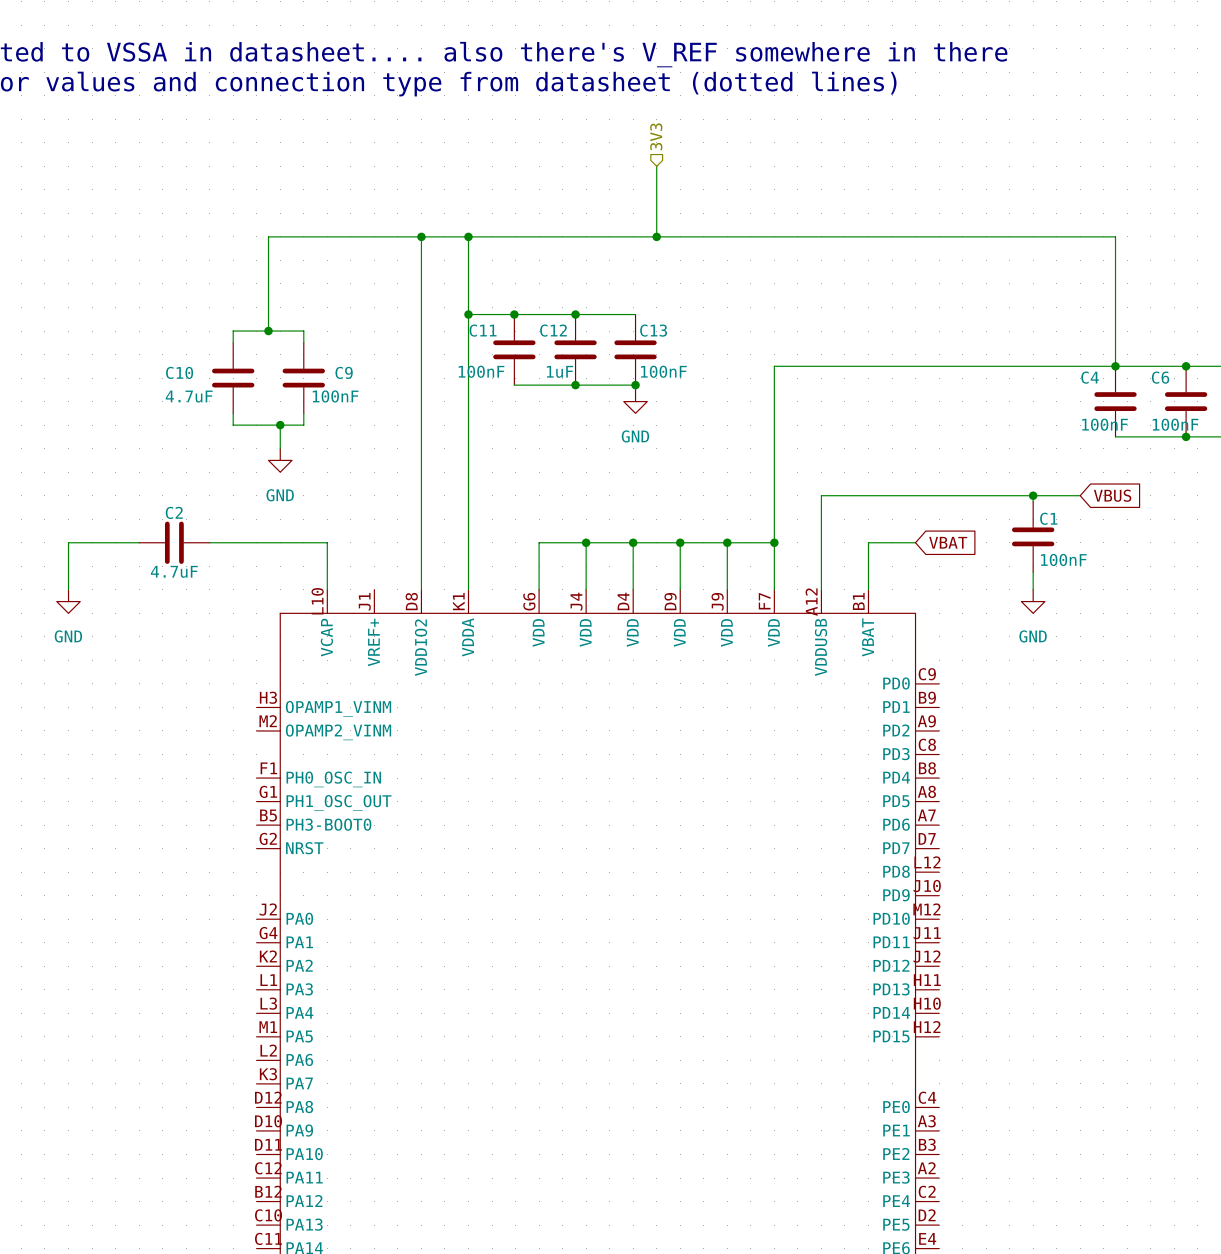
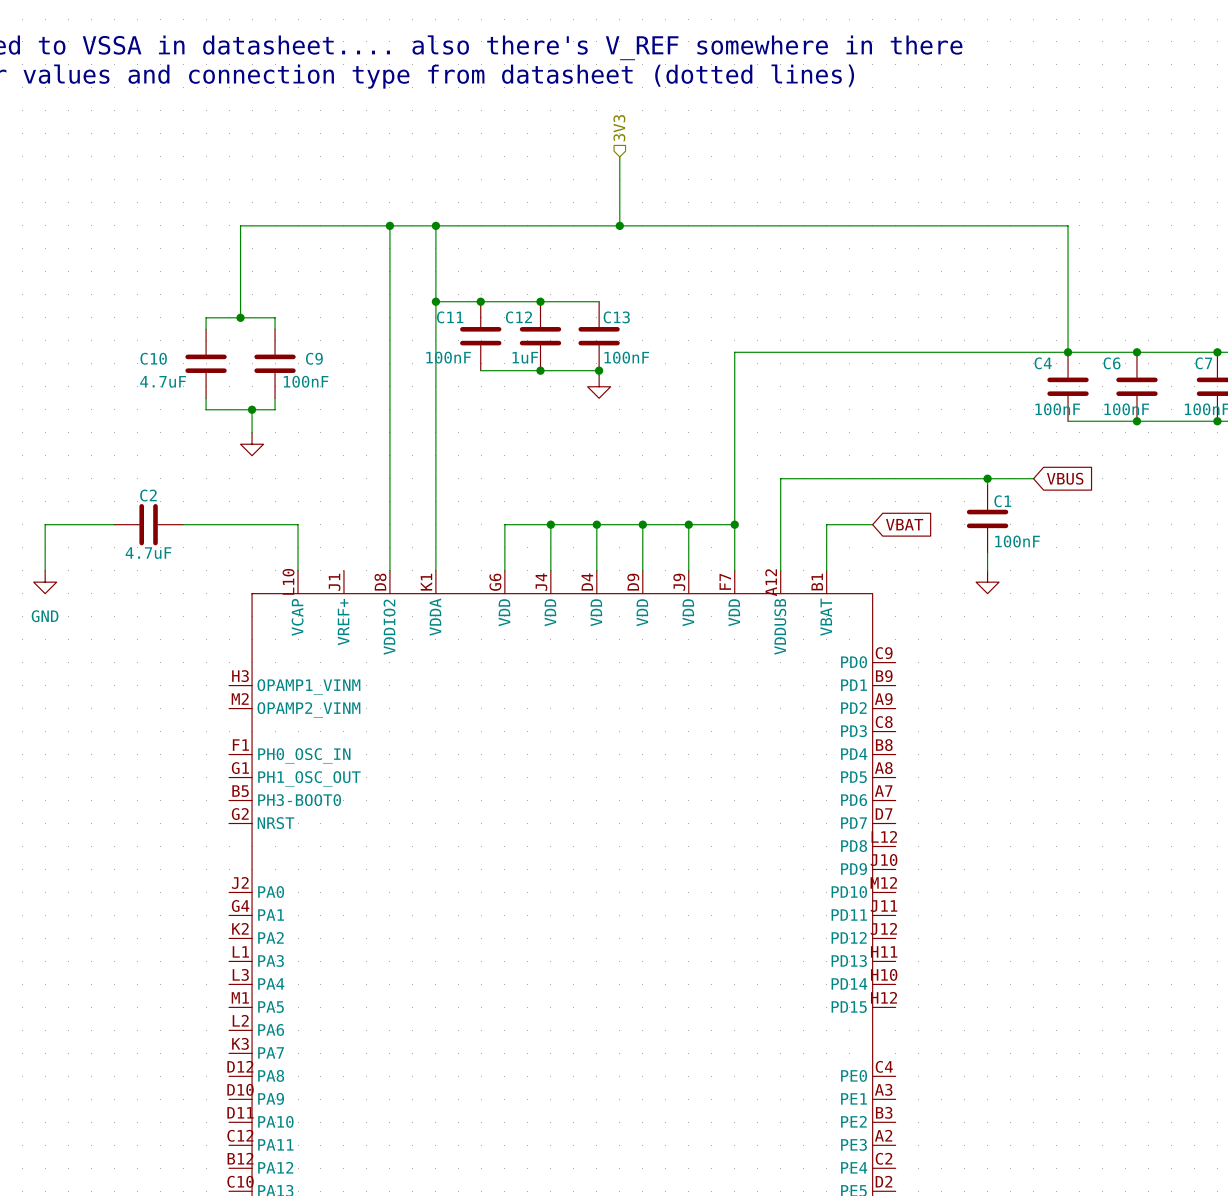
power symbol text: GND (635, 436) -> none
power symbol text: GND (280, 495) -> none
power symbol text: GND (1033, 636) -> none

